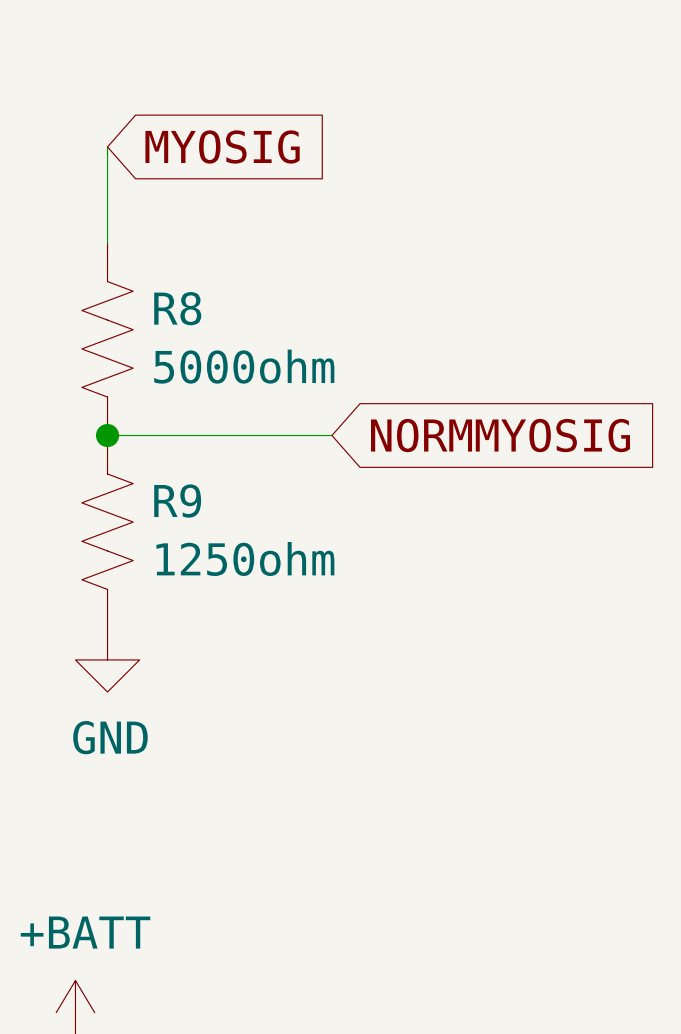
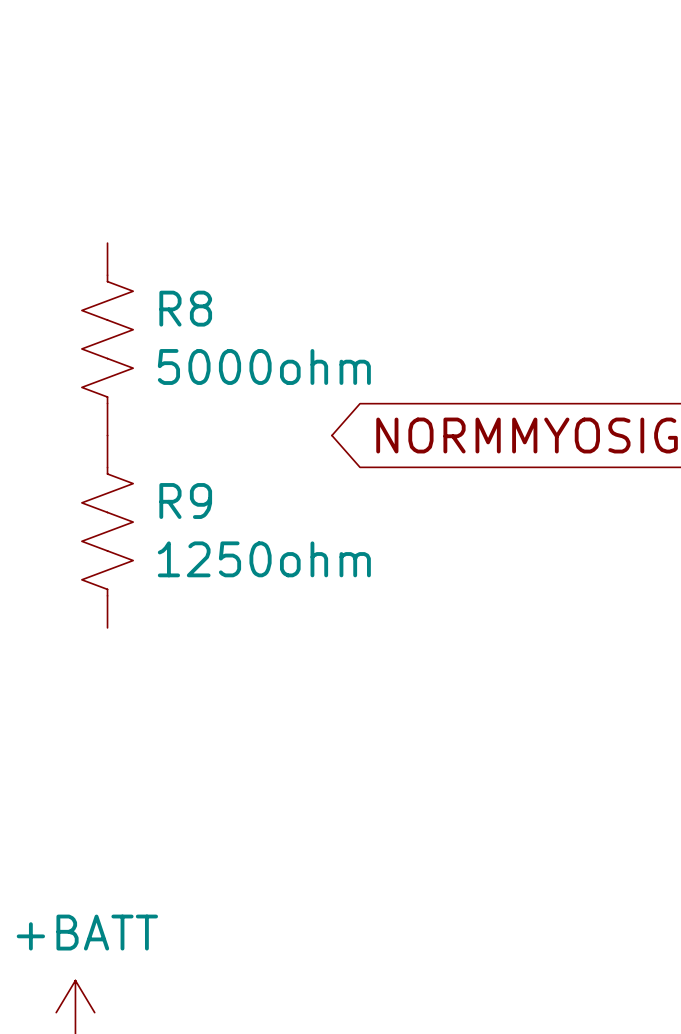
wire: (107, 146) (107, 243) -> none
global label: MYOSIG (222, 146) -> none
wire: (107, 435) (331, 435) -> none
junction: (107, 435) -> none
power symbol: GND (107, 659) -> none

